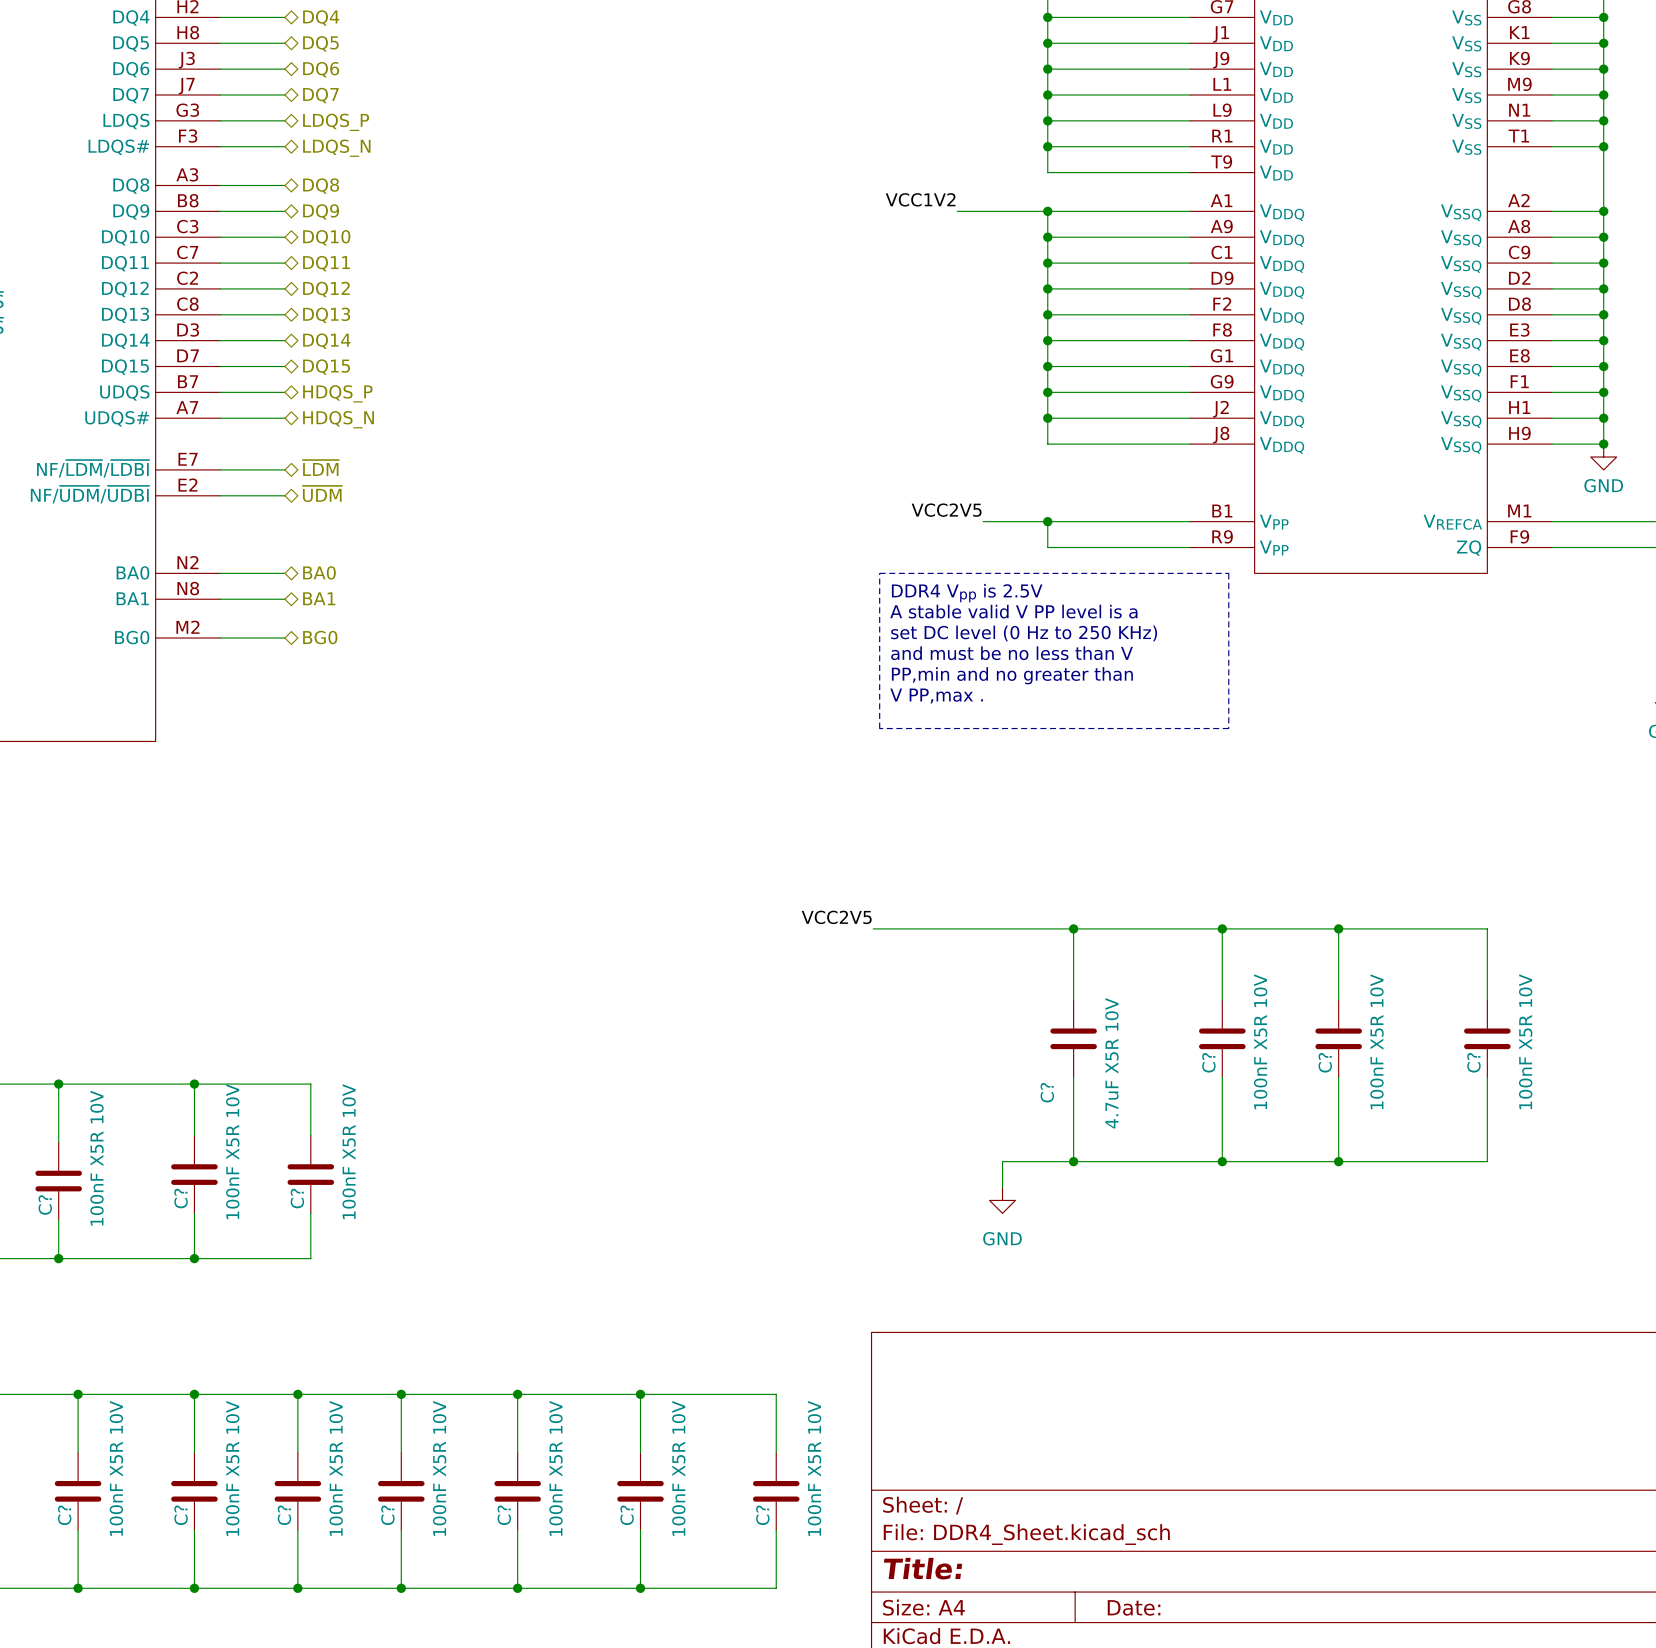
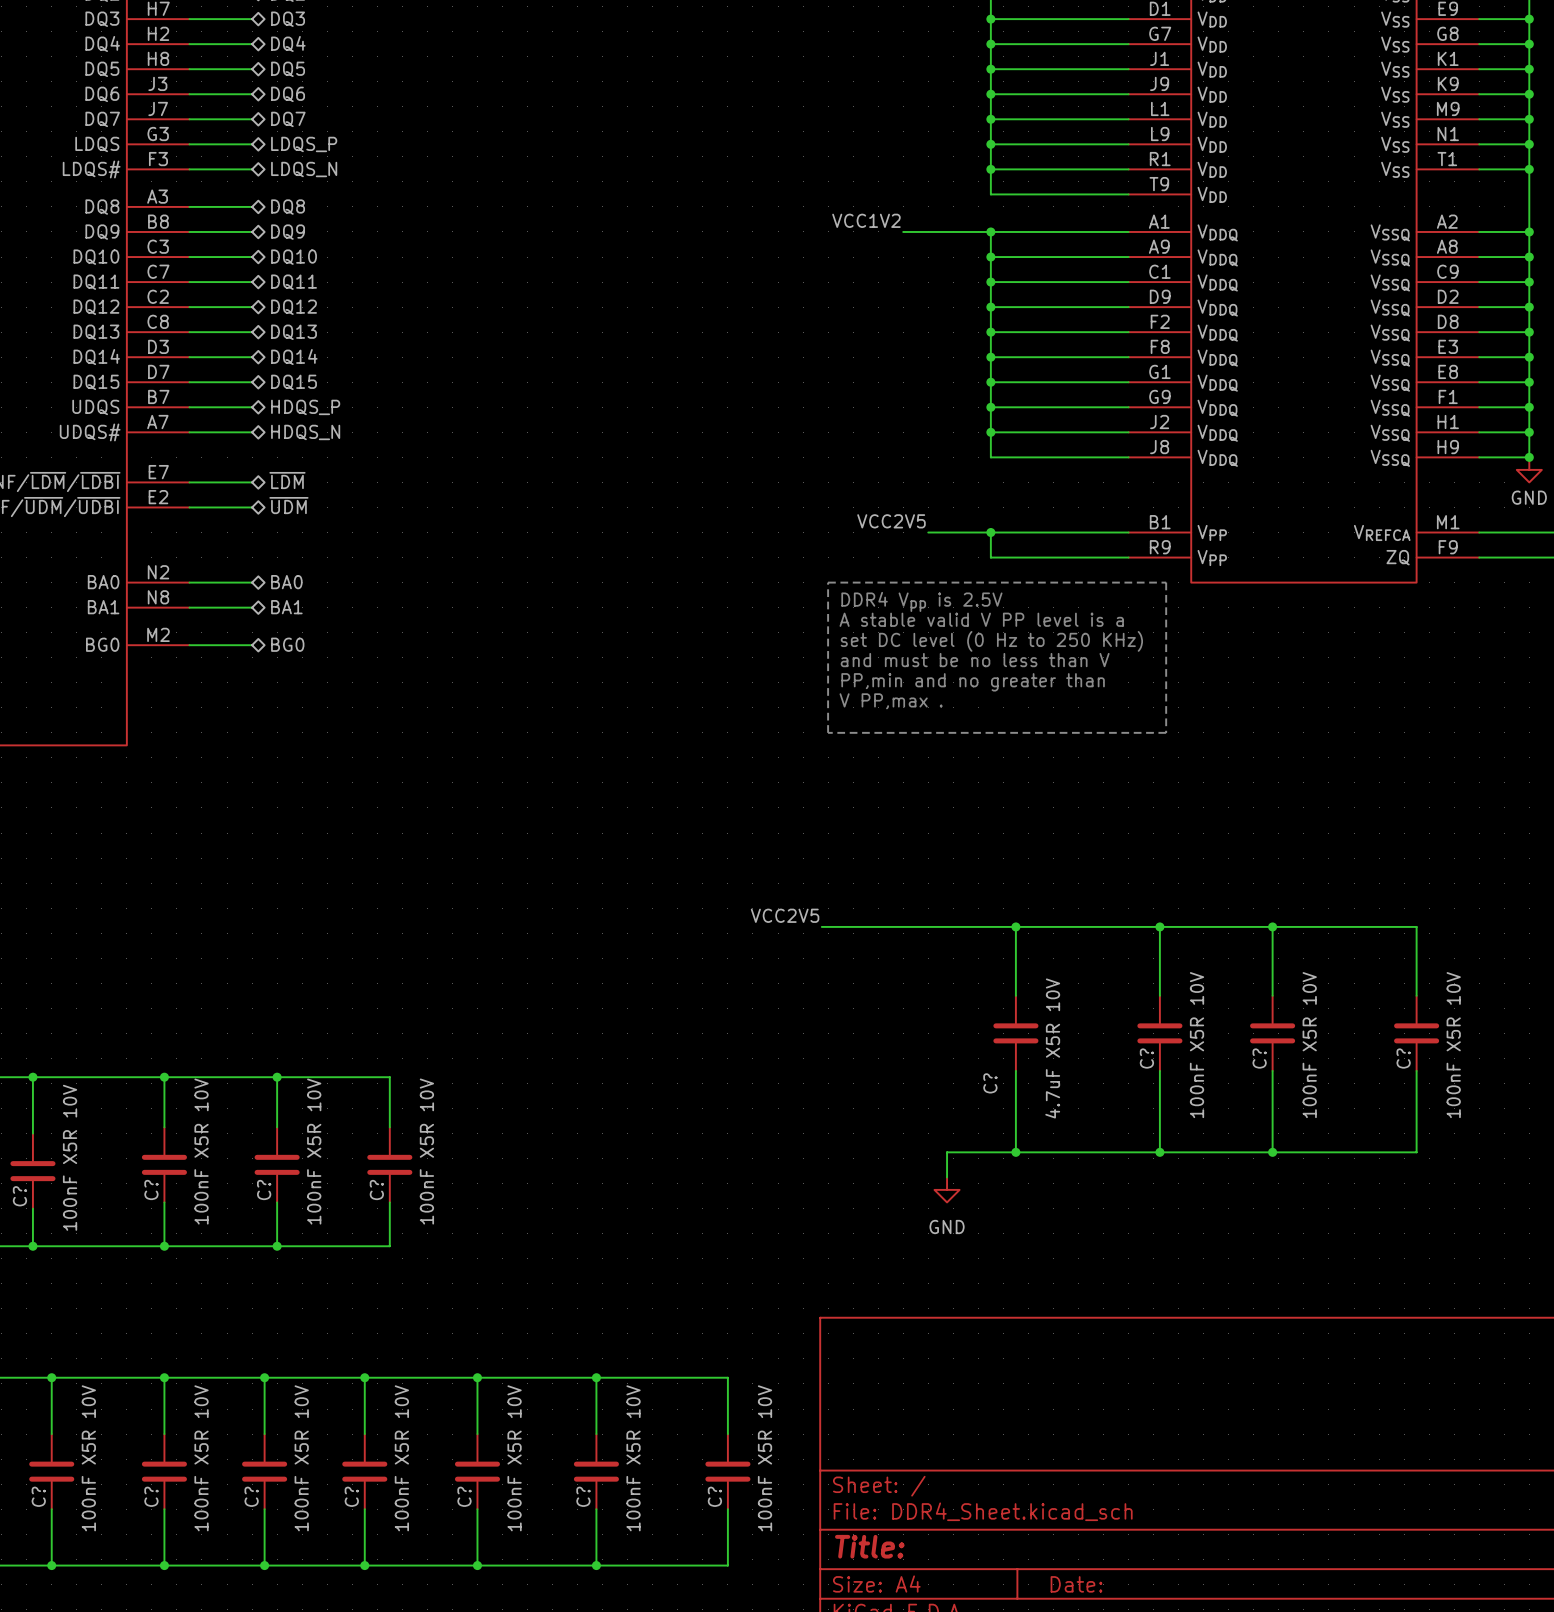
wire: none -> (277, 1077) (389, 1077) (389, 1127)
junction: none -> (277, 1077)
C?: none -> 100nF X5R 10V (389, 1164)
wire: none -> (389, 1202) (389, 1246) (277, 1246)
junction: none -> (277, 1246)

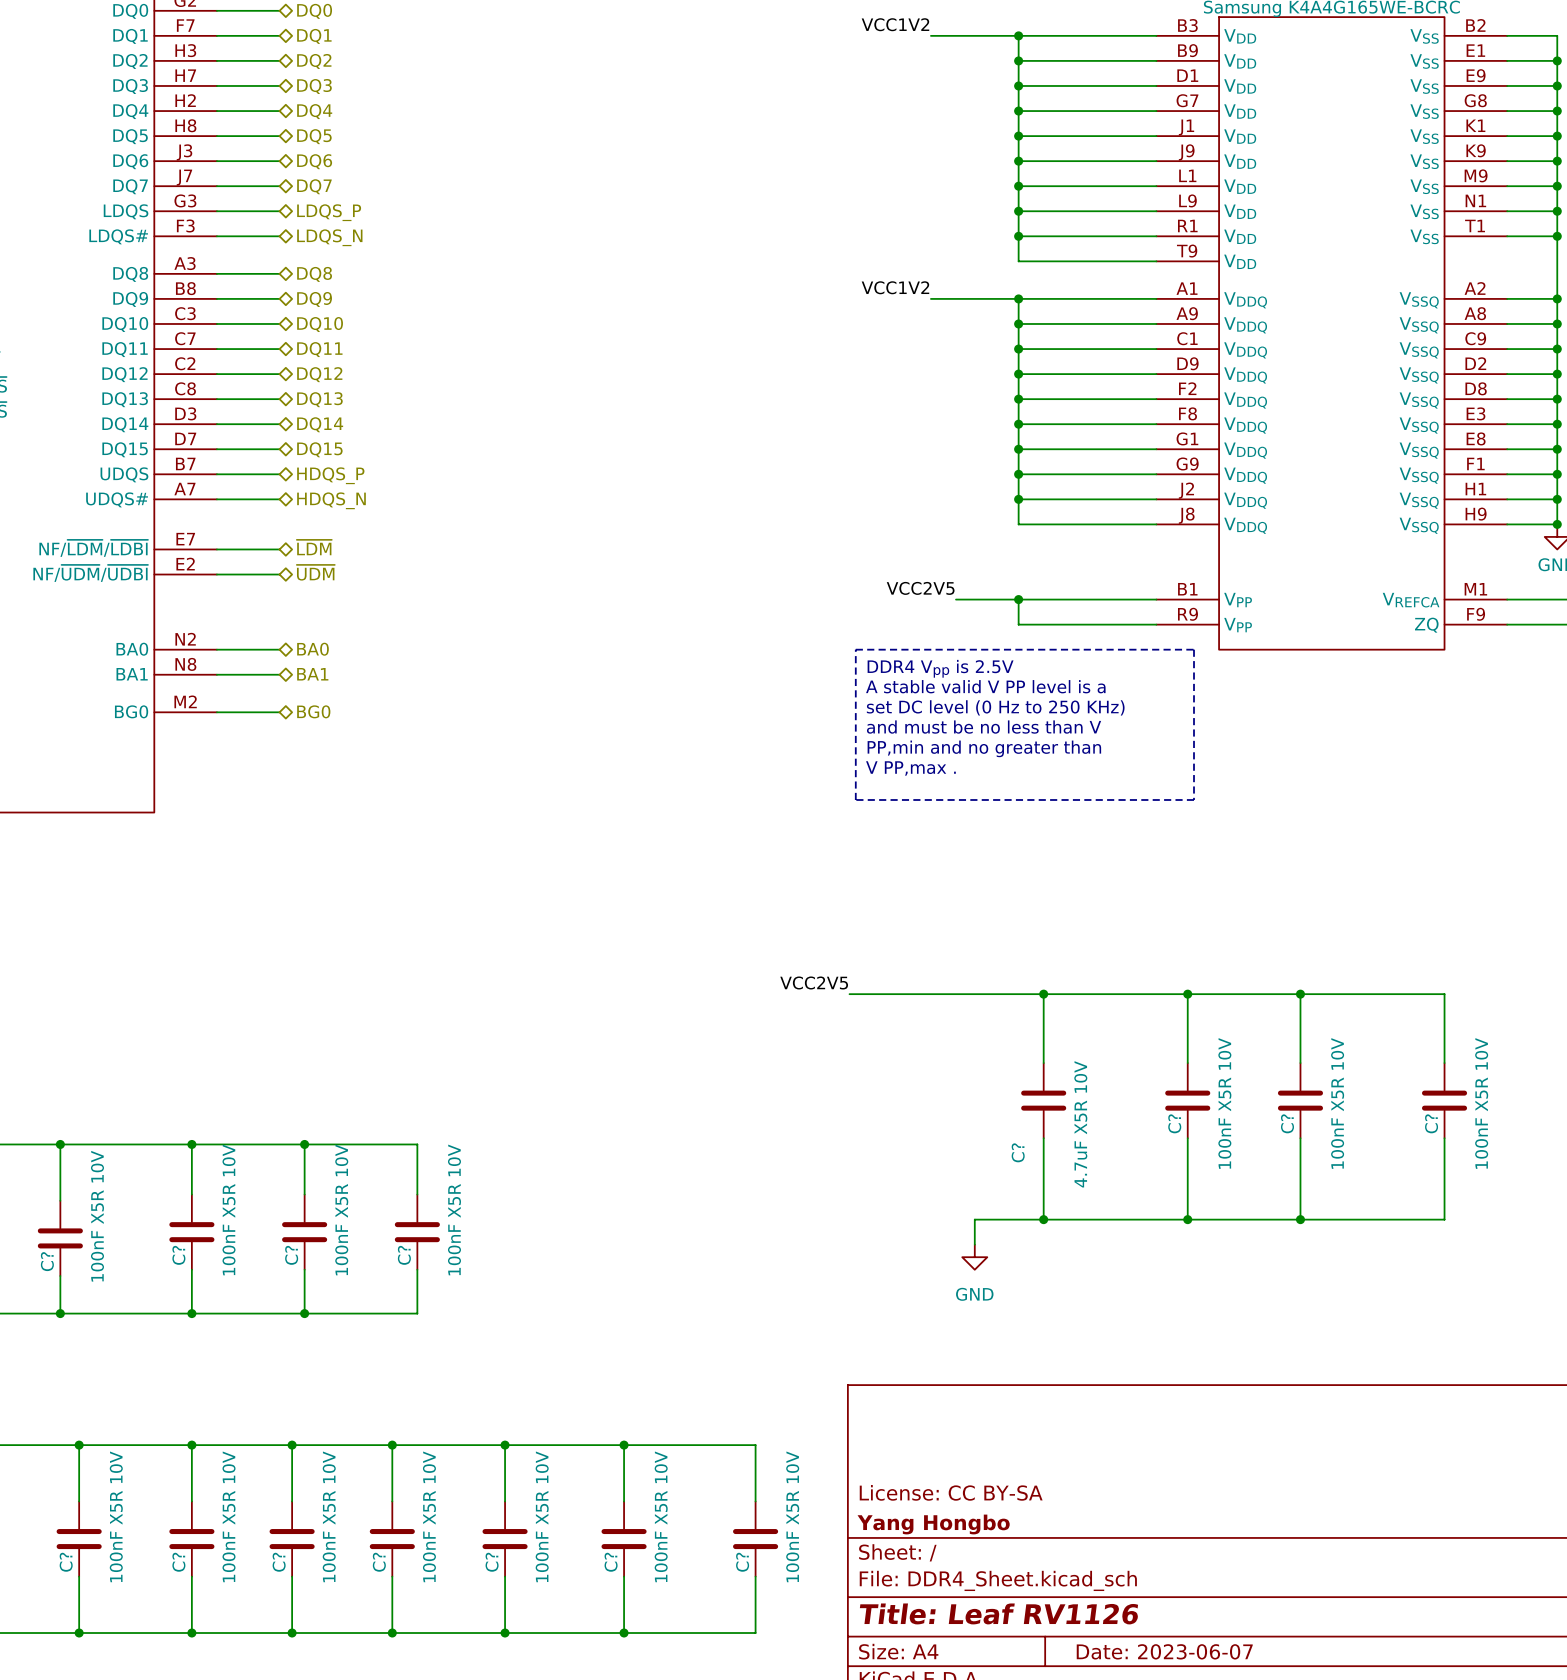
title block: none -> License: CC BY-SA (951, 1492)
title block: none -> Yang Hongbo (933, 1524)
title block: Title: (869, 1546) -> Title: Leaf RV1126 (999, 1613)
title block: Date: (1076, 1584) -> Date: 2023-06-07 (1164, 1651)

